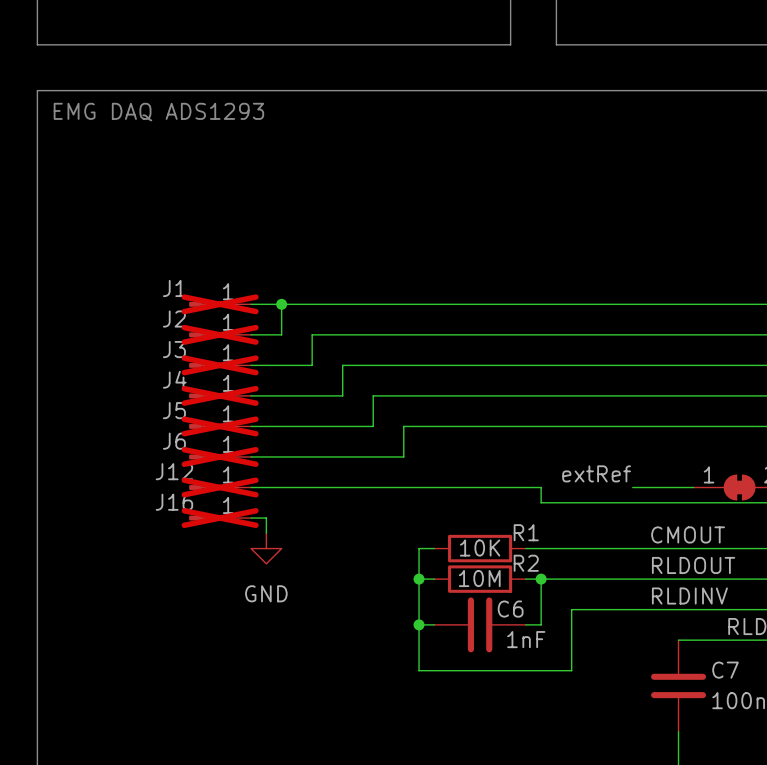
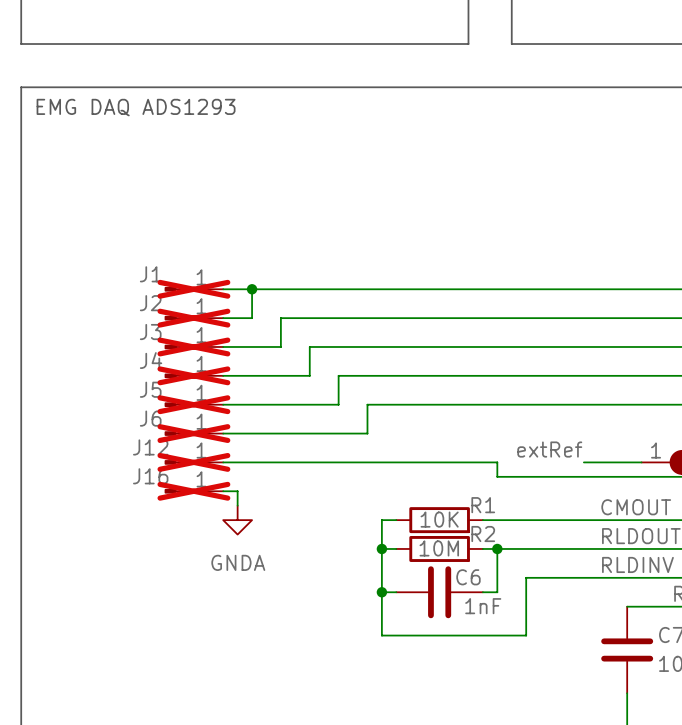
power symbol: GND (266, 548) -> GNDA (237, 520)

